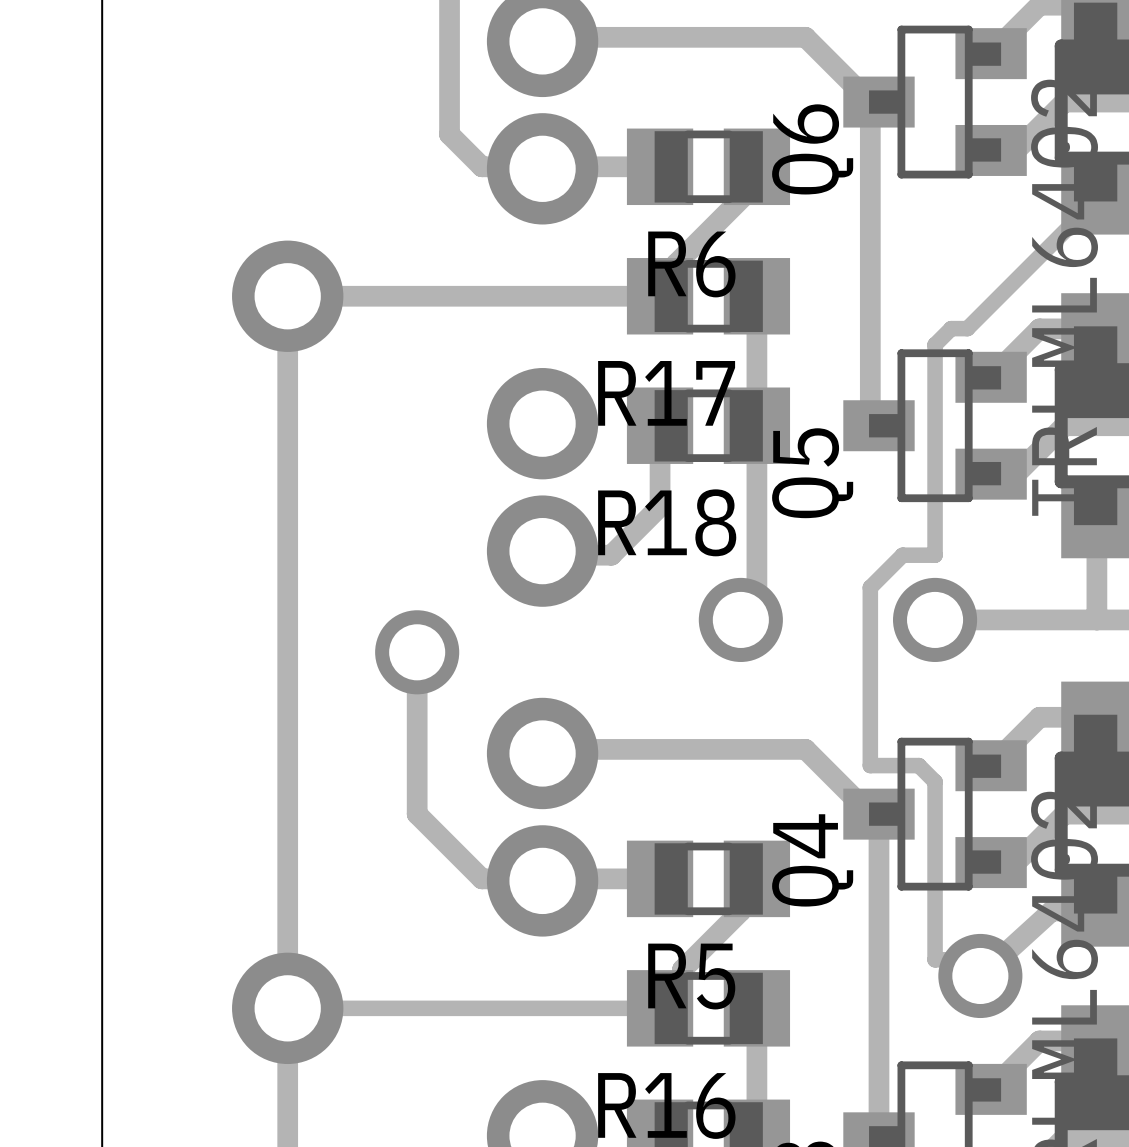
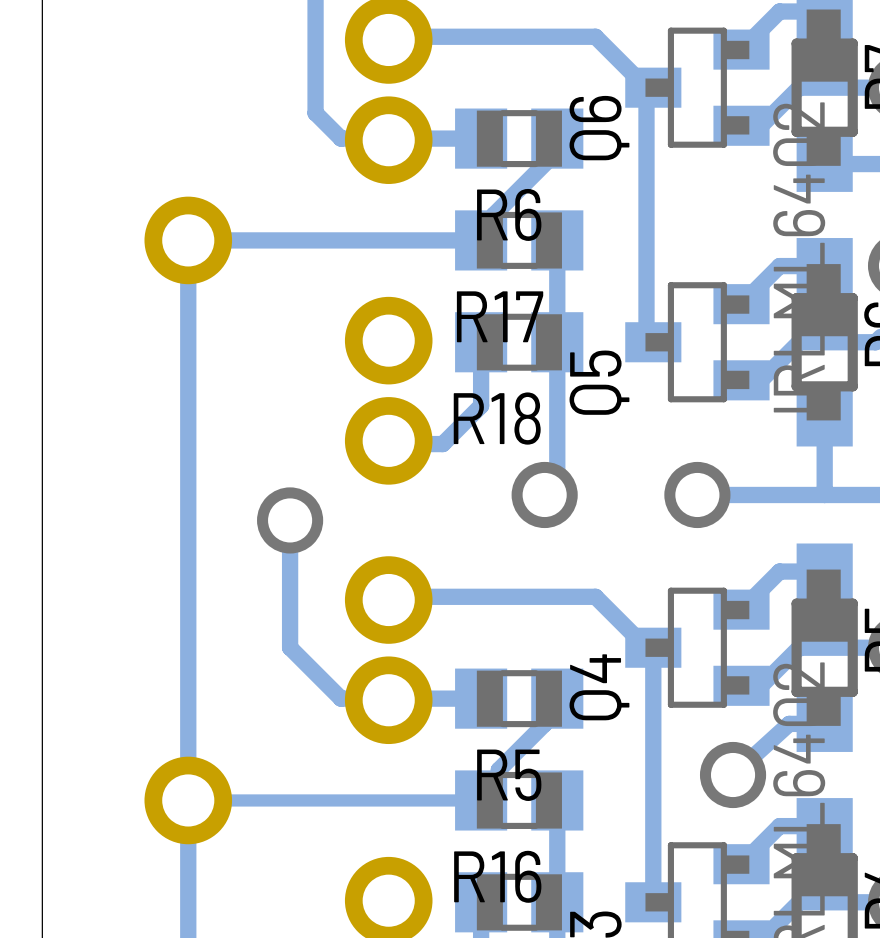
track: (1096, 199) (967, 328) (951, 328) (935, 344) (935, 555) (902, 555) (870, 587) (870, 765) (918, 765) (935, 781) (935, 959) (983, 959) (980, 975) -> none

